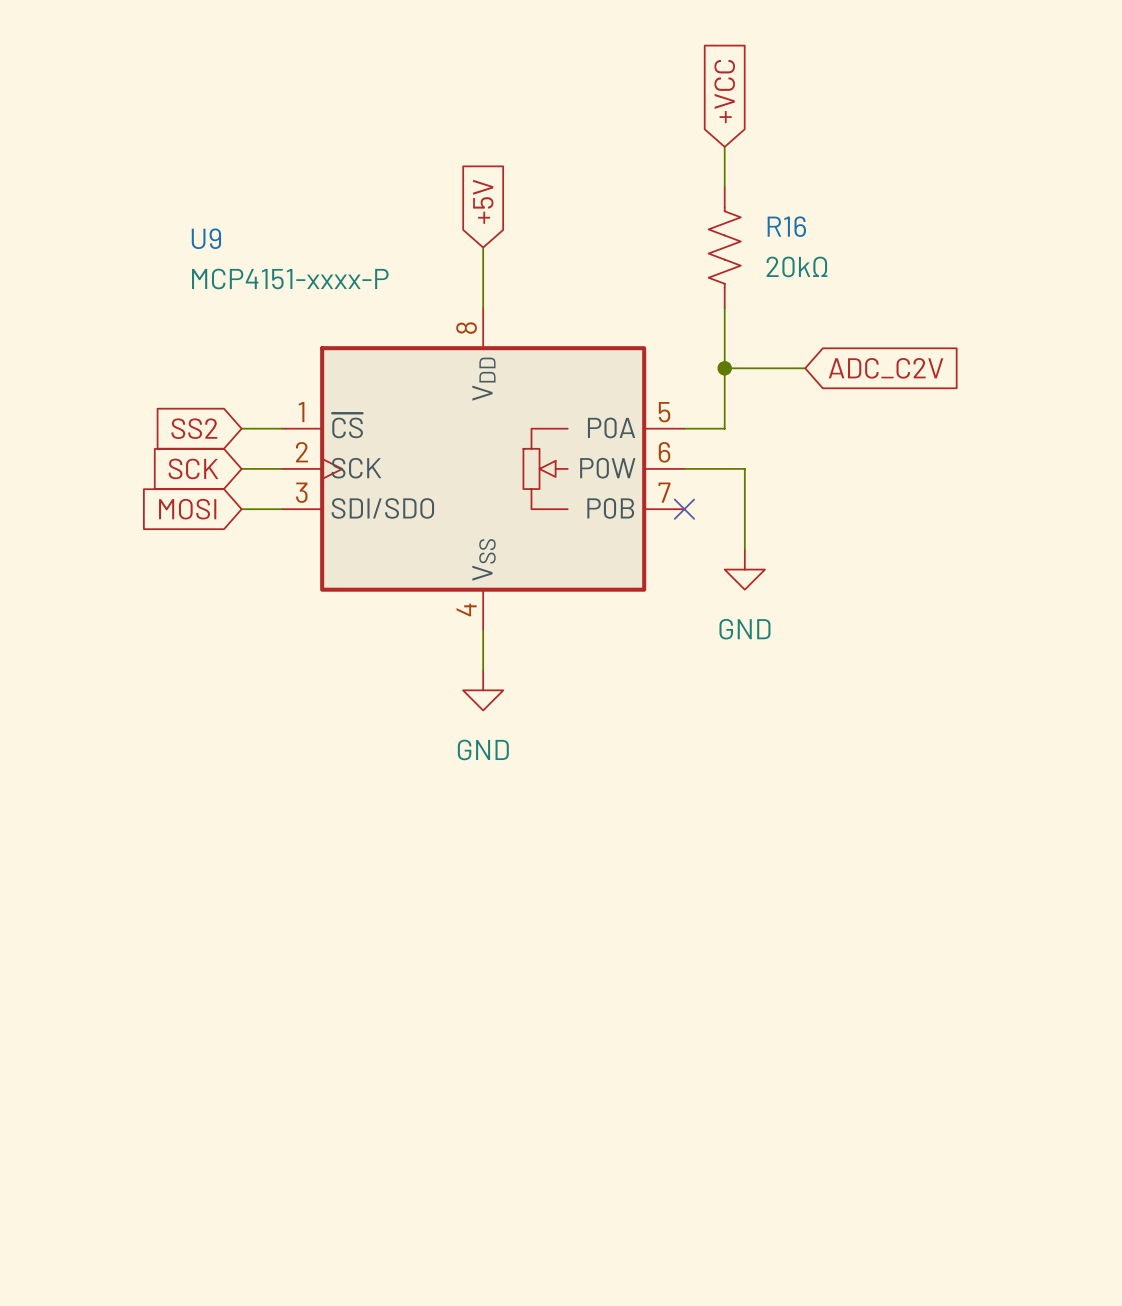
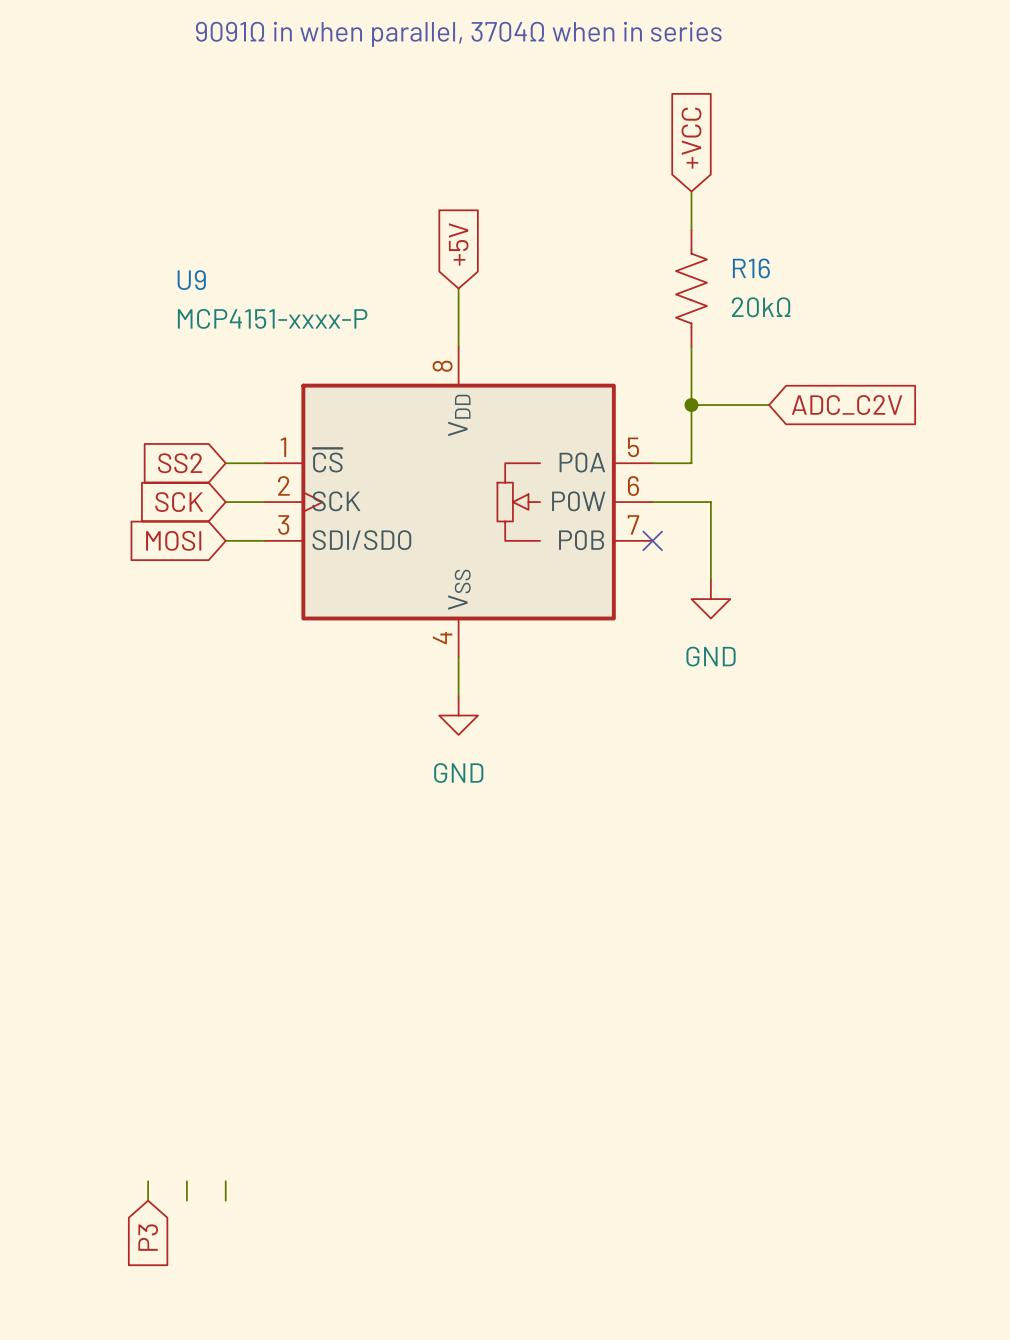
wire: none -> (148, 1181) (148, 1200)
wire: none -> (186, 1181) (186, 1200)
wire: none -> (225, 1181) (225, 1200)
global label: none -> P3 (148, 1237)

